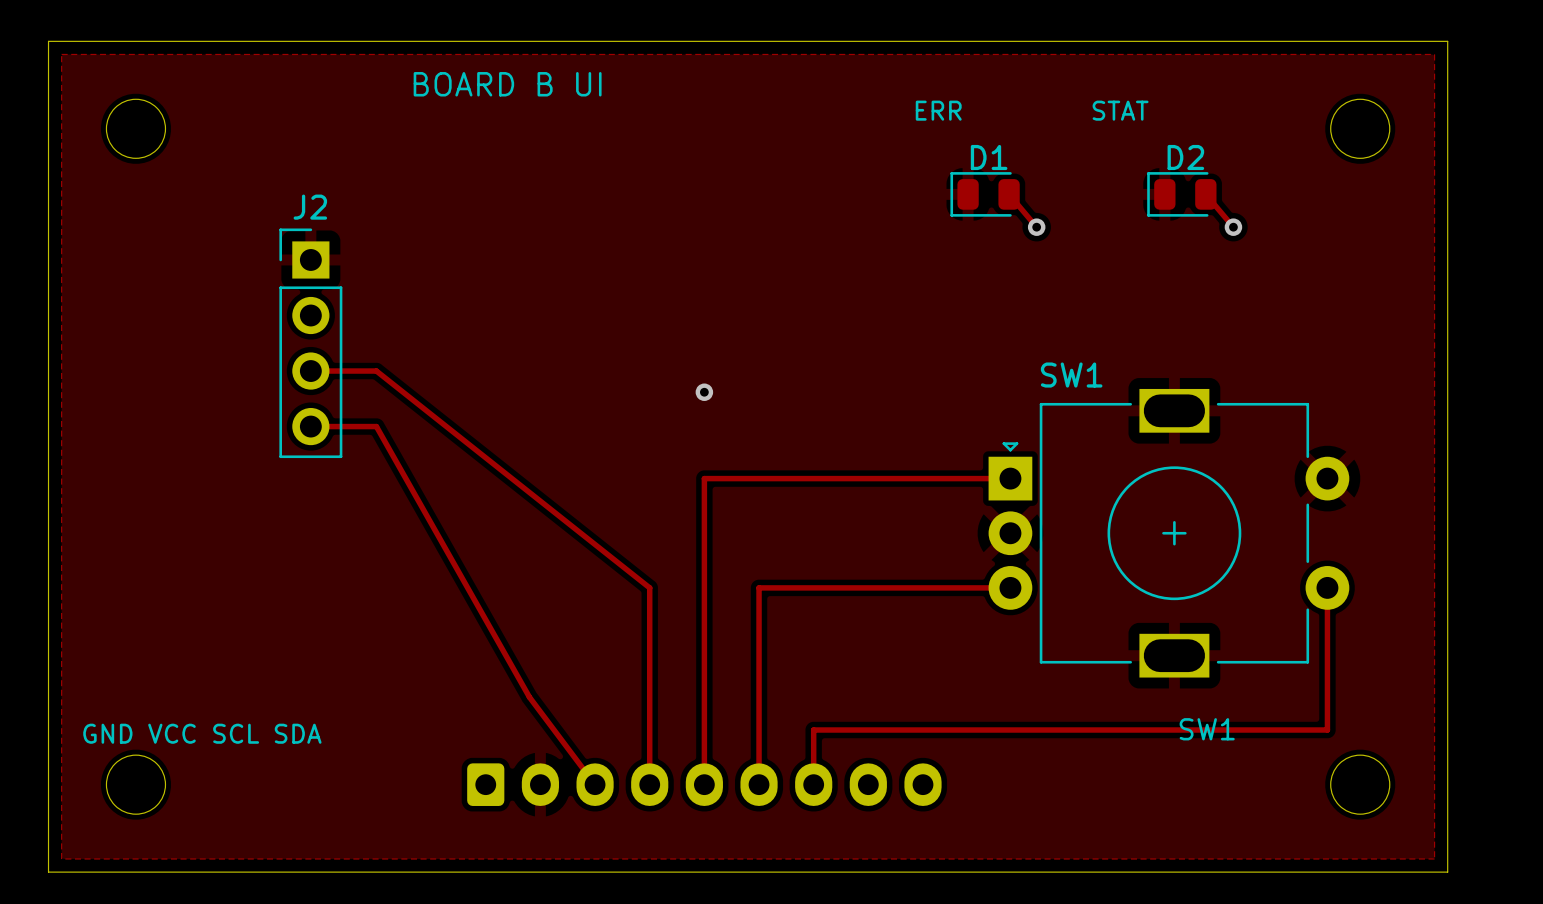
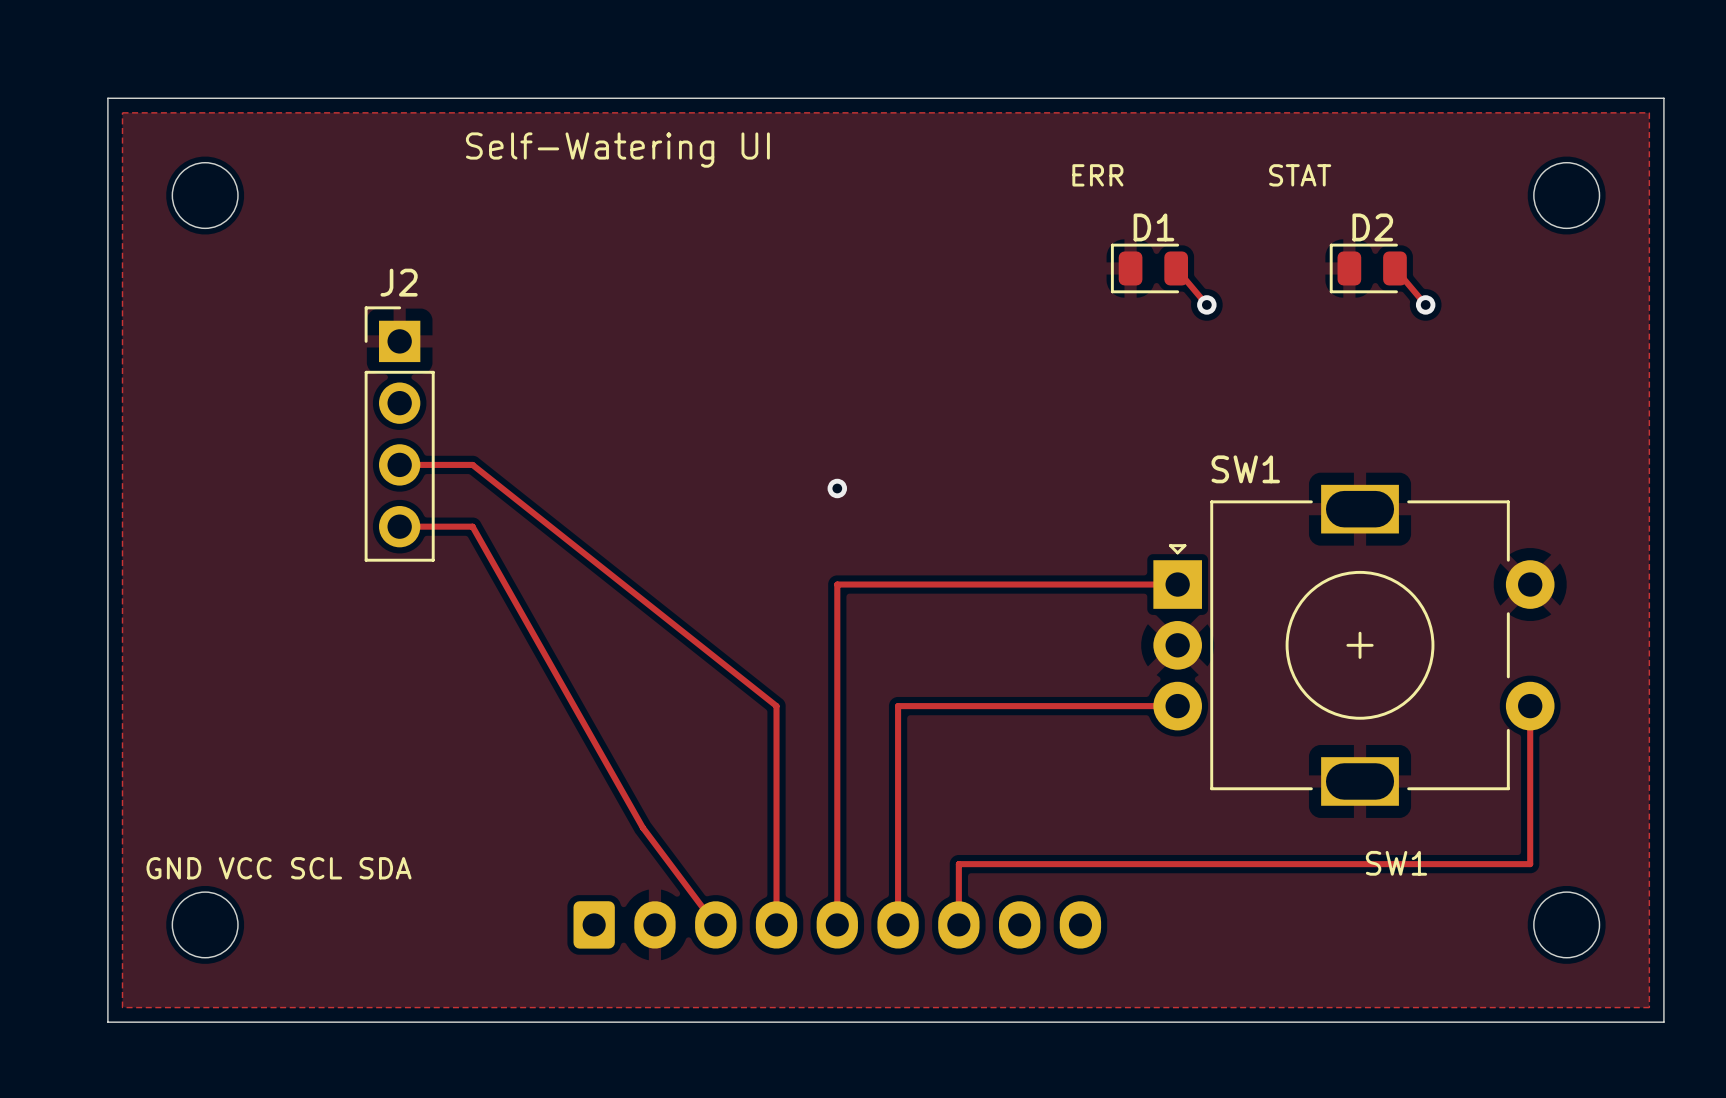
text: BOARD B UI (507, 84) -> Self-Watering UI (617, 150)

